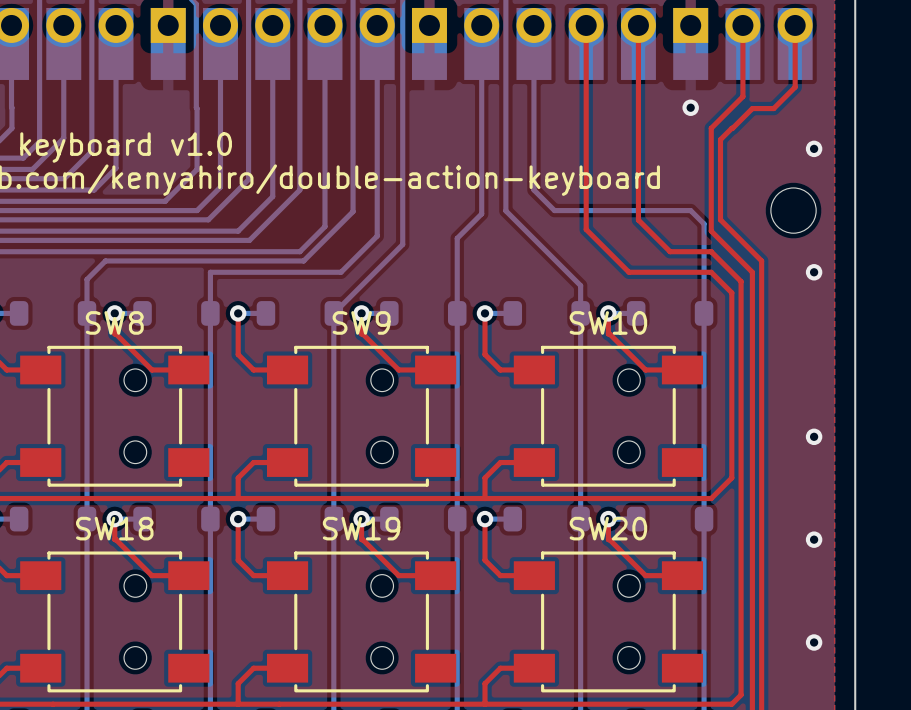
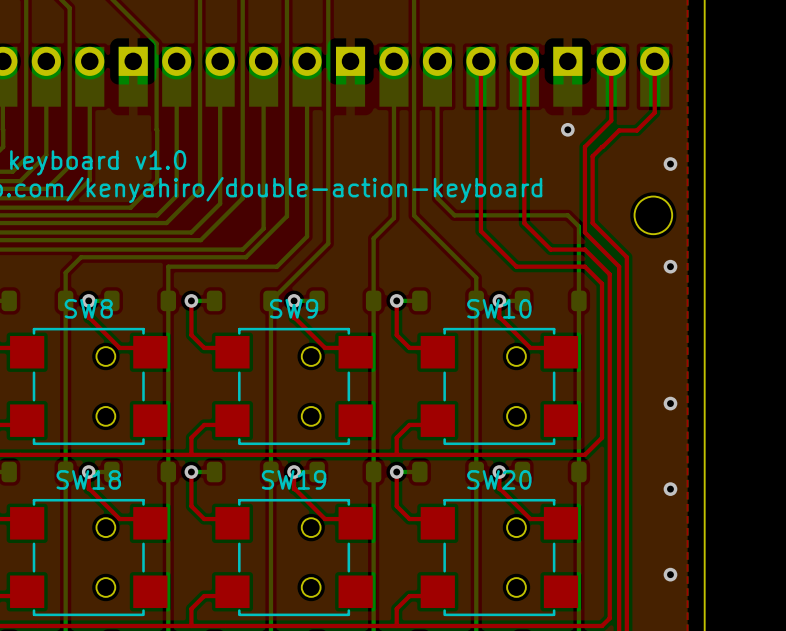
SW8 footprint: [20, 345, 210, 487] -> [10, 327, 168, 446]
SW9 footprint: [266, 345, 457, 487] -> [215, 327, 373, 446]
SW10 footprint: [513, 345, 704, 487] -> [420, 327, 579, 446]
SW18 footprint: [20, 551, 210, 693] -> [10, 498, 168, 617]
SW19 footprint: [266, 551, 457, 693] -> [215, 498, 373, 617]
SW20 footprint: [513, 551, 704, 693] -> [420, 498, 579, 617]

